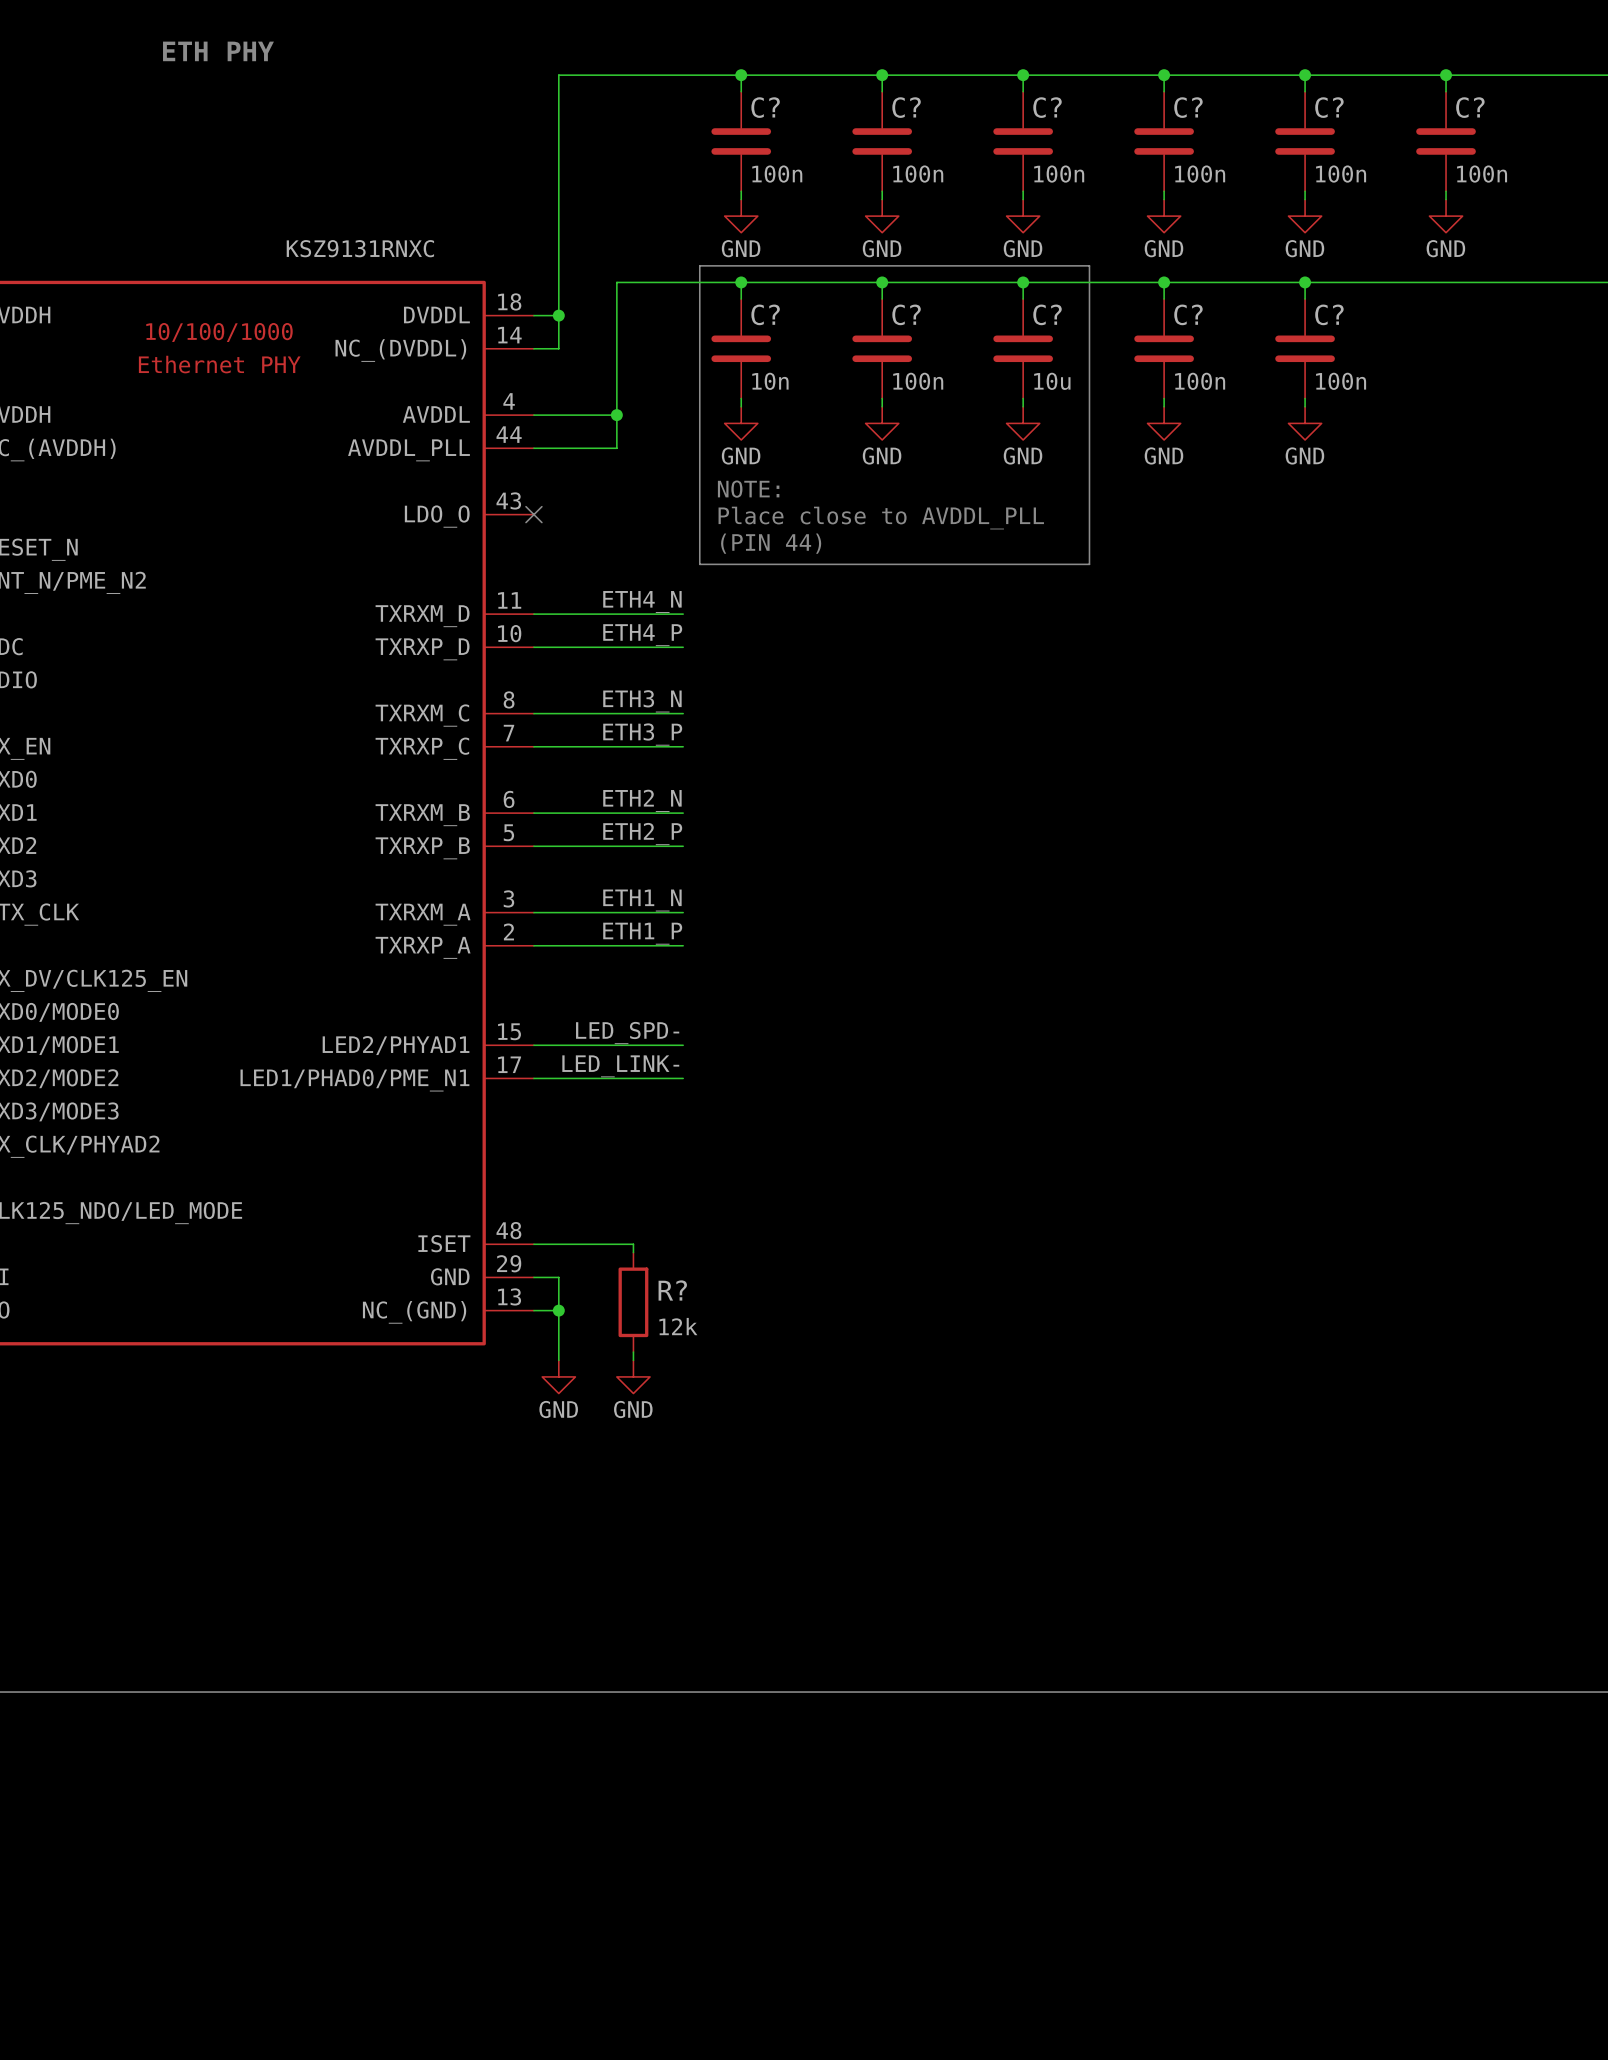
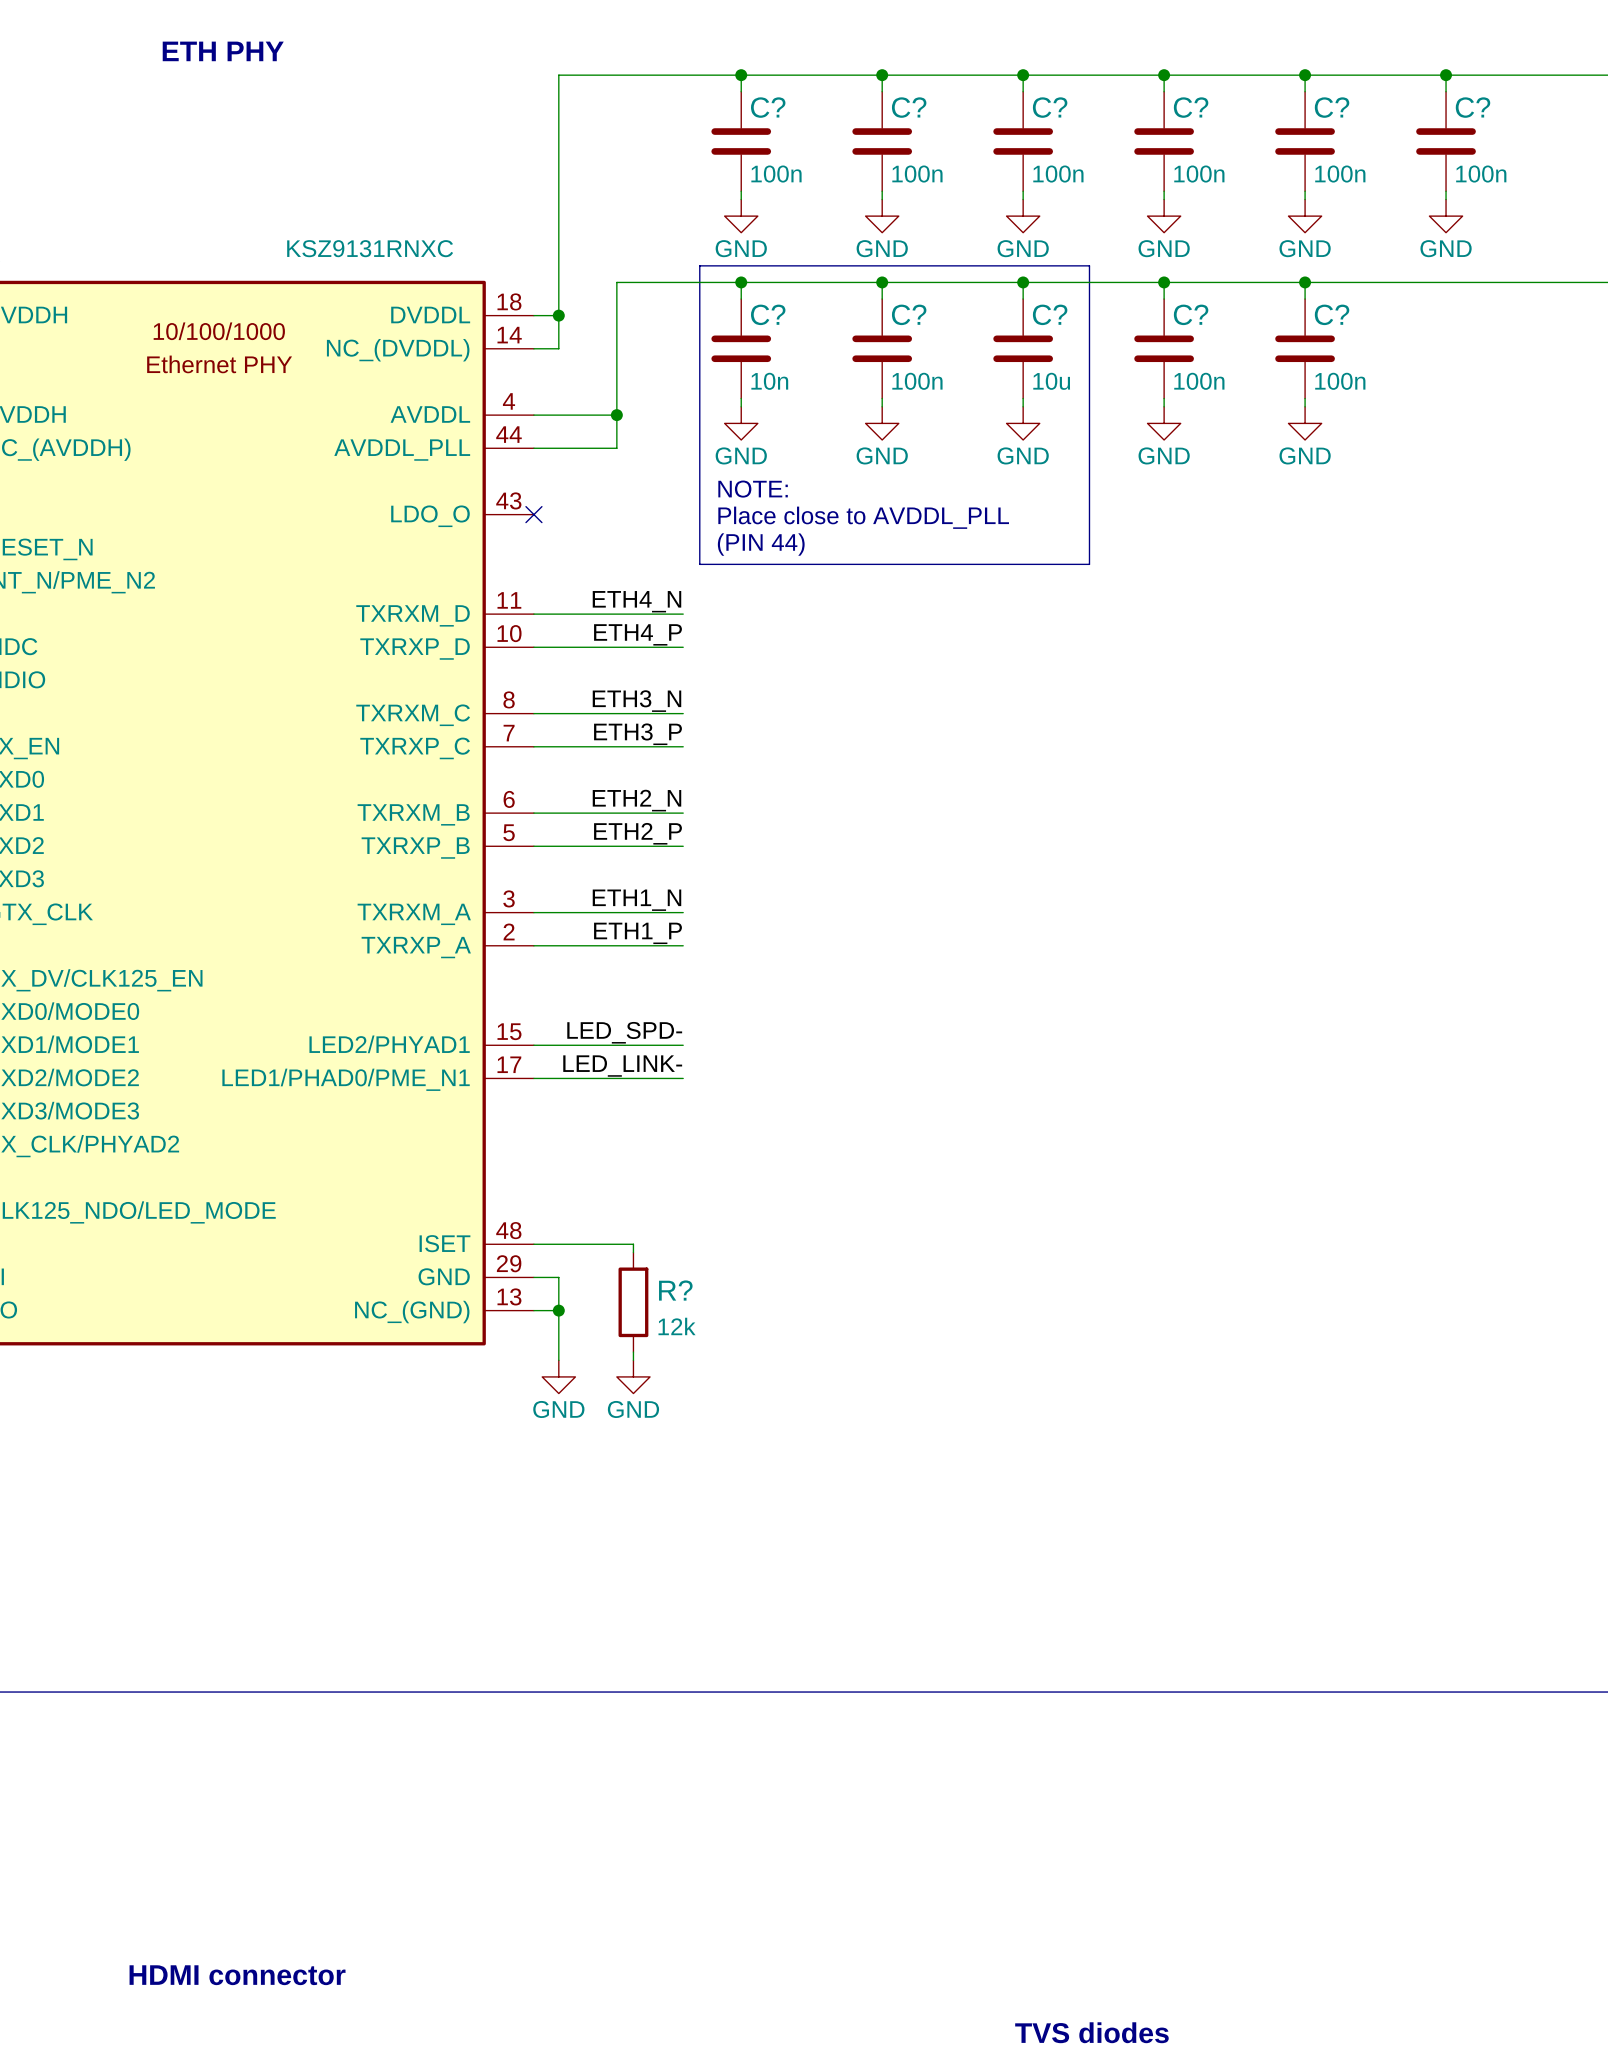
text: none -> HDMI connector (237, 1975)
text: none -> TVS diodes (1091, 2032)

